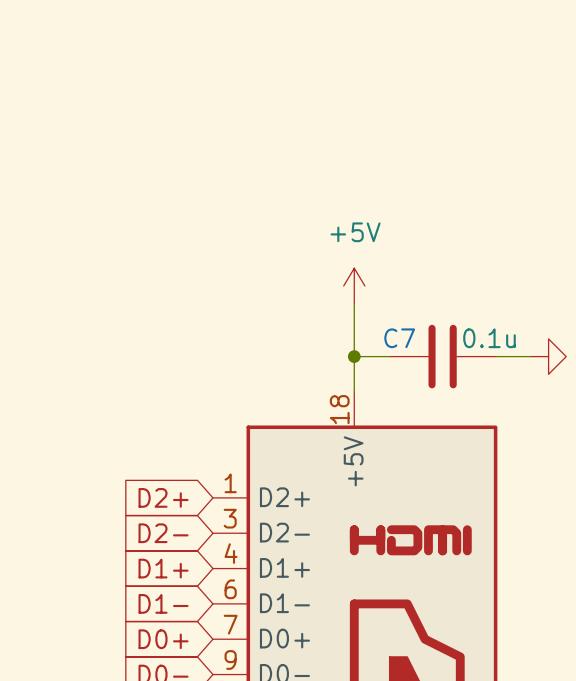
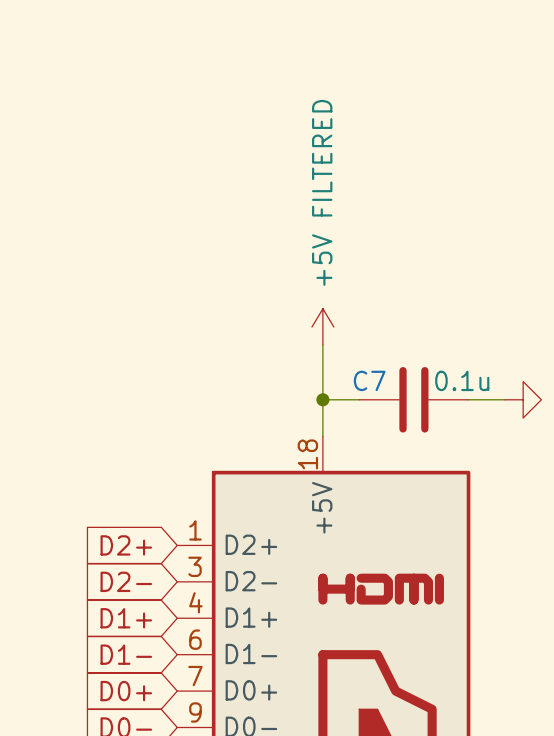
power symbol: +5V (354, 285) -> +5V FILTERED (322, 326)

